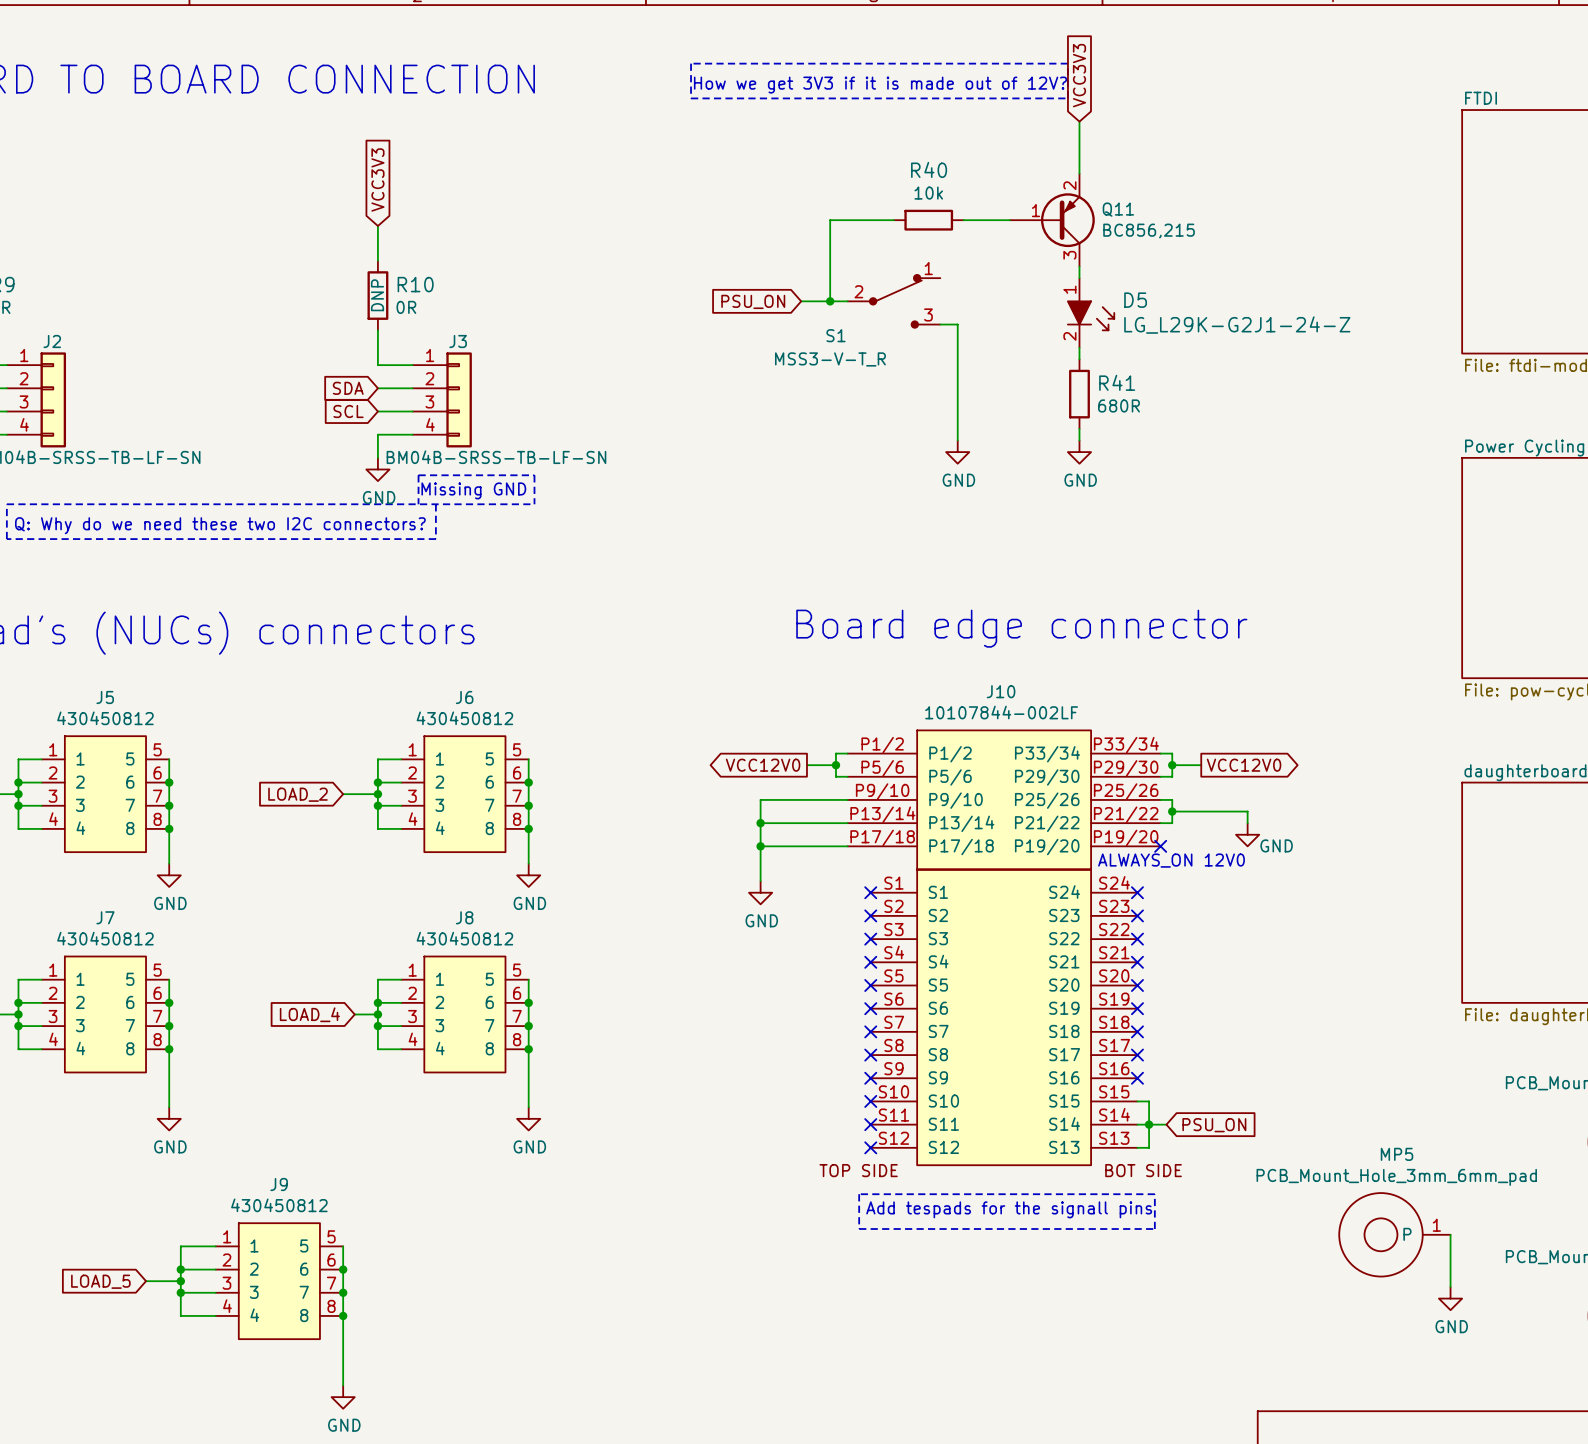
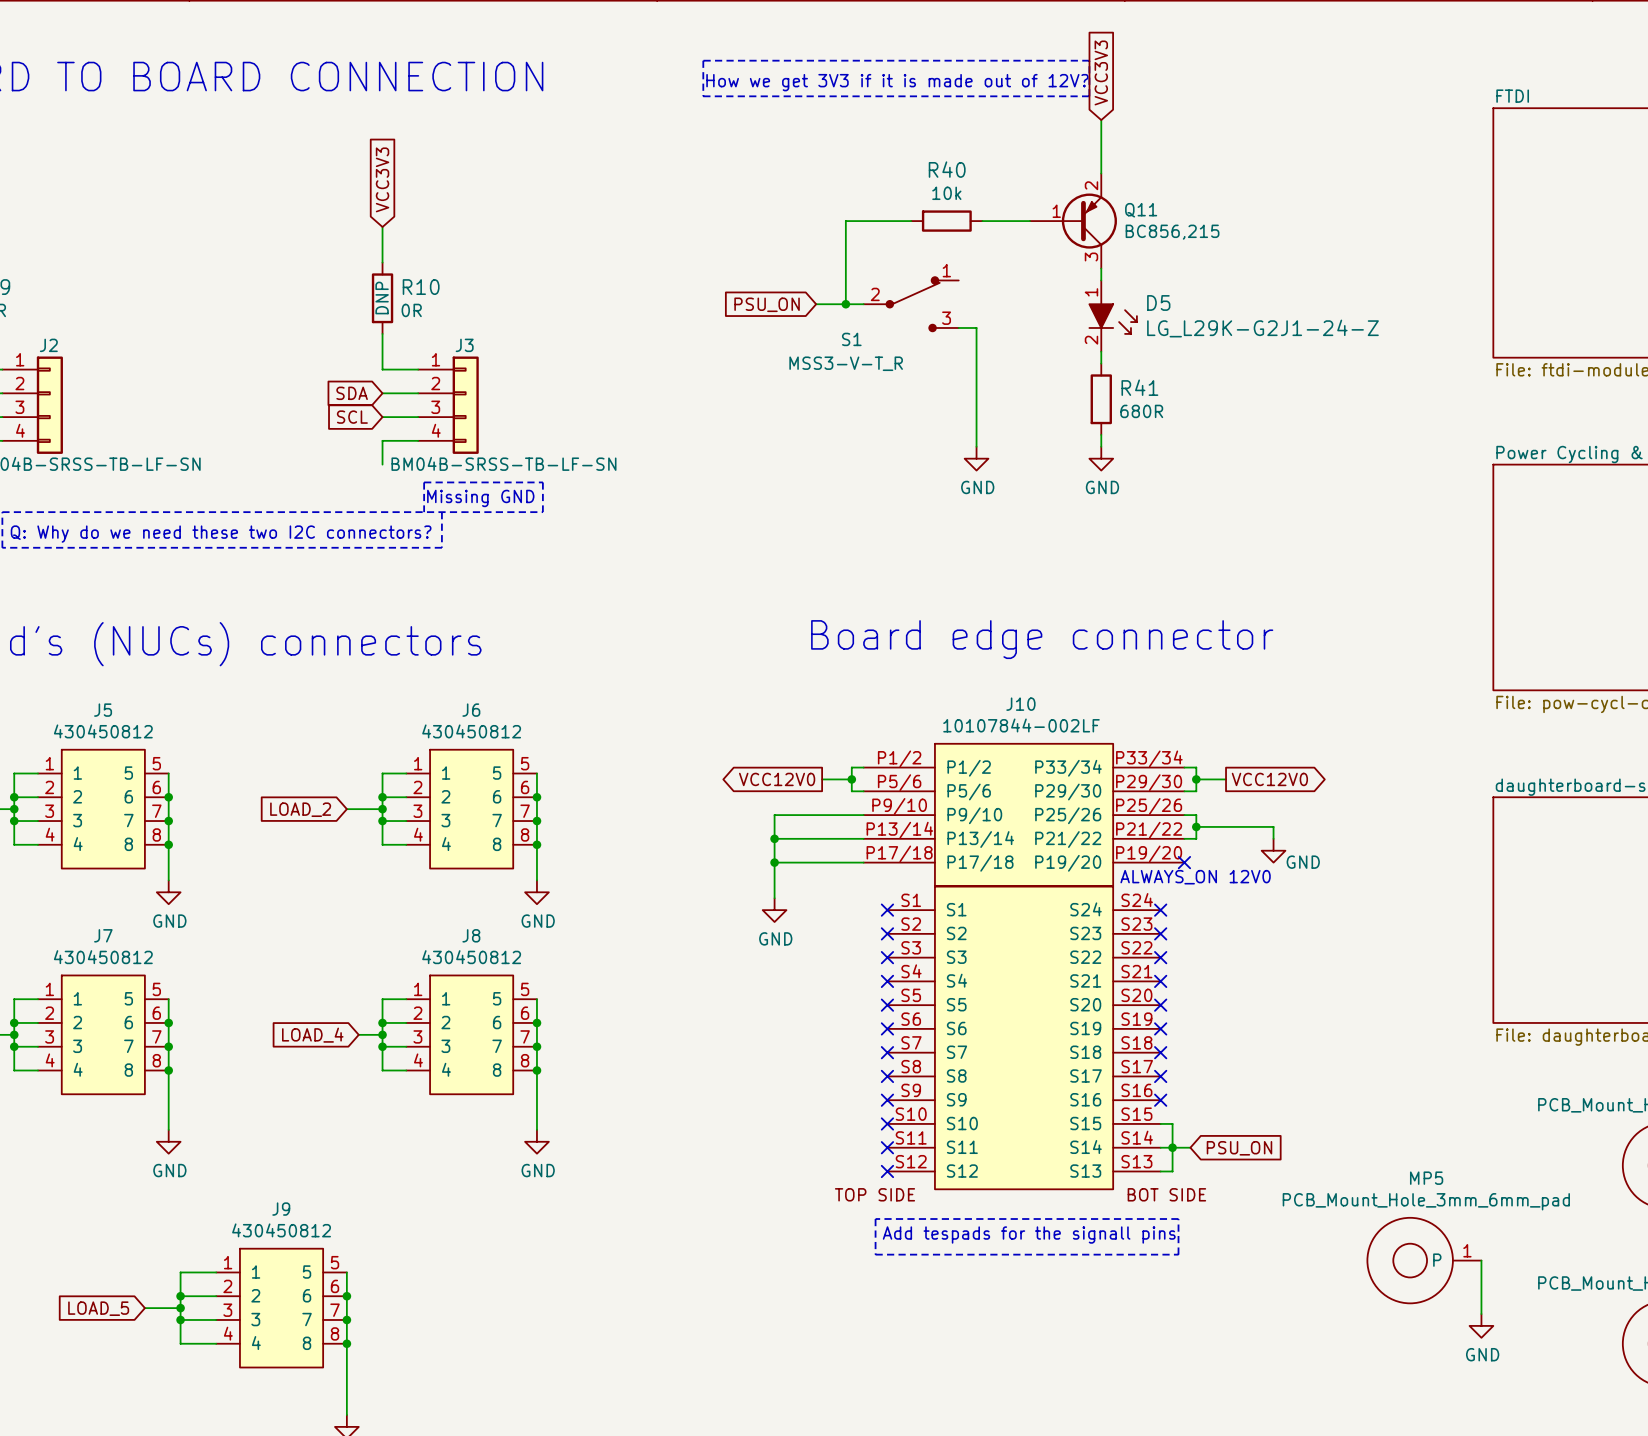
power symbol: GND (377, 469) -> none

